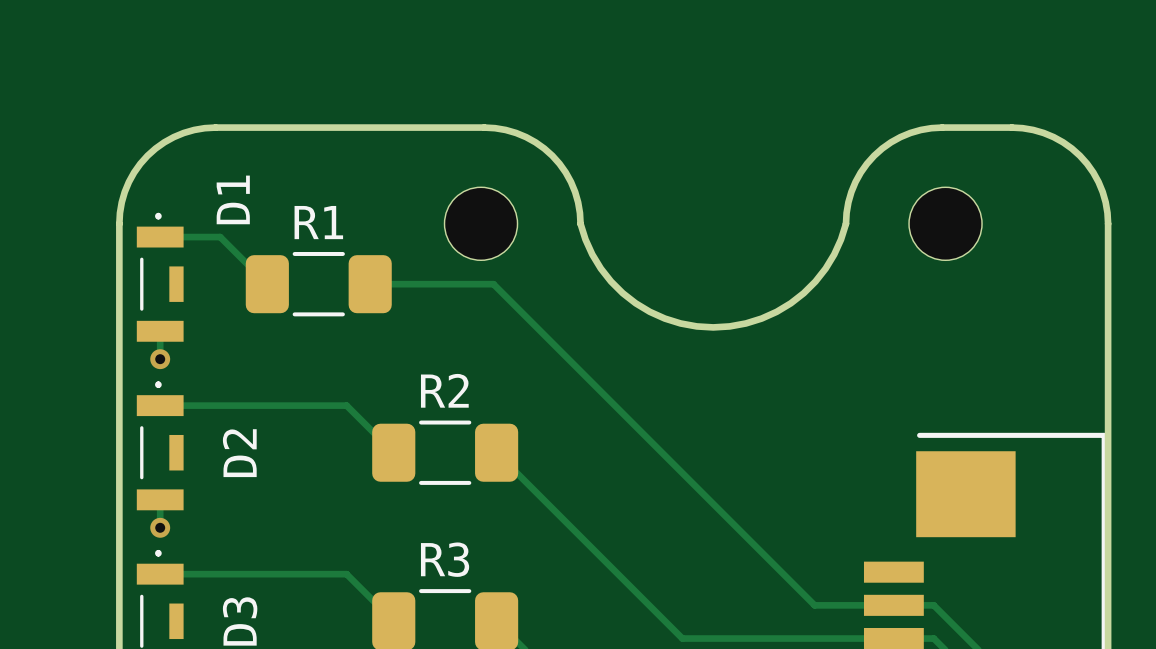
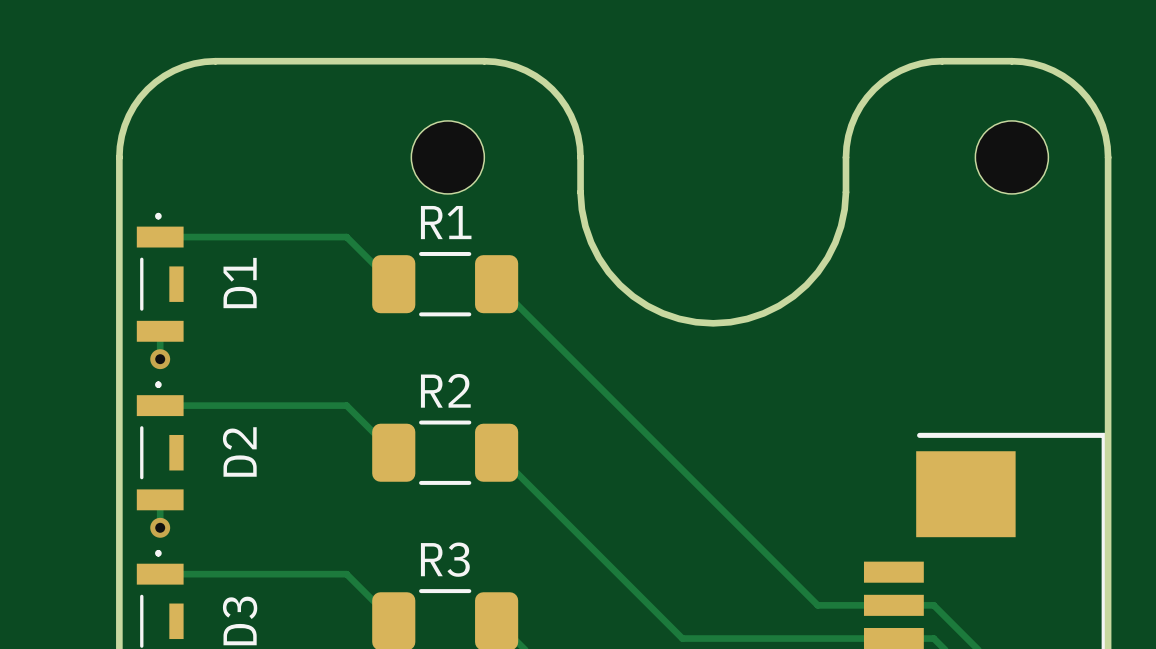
D1 name position: D1 (233, 199) -> D1 (240, 283)
board edge: (119, 223) (124, 192) (140, 163) (164, 142) (194, 129) (215, 127) (484, 127) (505, 129) (535, 142) (559, 163) (575, 192) (580, 223) (592, 254) (600, 268) (622, 293) (635, 303) (664, 318) (696, 326) (713, 327) (729, 326) (761, 318) (776, 311) (803, 293) (815, 281) (834, 254) (845, 223) (851, 192) (866, 163) (891, 142) (920, 129) (942, 127) (1011, 127) (1033, 129) (1053, 137) (1071, 148) (1093, 172) (1102, 192) (1108, 223) -> (119, 223) (119, 146) (124, 125) (134, 106) (155, 82) (173, 70) (194, 63) (215, 61) (484, 61) (505, 63) (526, 70) (544, 82) (559, 97) (575, 125) (579, 146) (581, 209) (591, 242) (598, 257) (620, 285) (647, 305) (662, 313) (696, 322) (730, 322) (763, 313) (793, 296) (817, 272) (827, 257) (841, 226) (845, 192) (846, 146) (855, 115) (866, 97) (882, 82) (900, 70) (920, 63) (942, 61) (1022, 61) (1053, 70) (1071, 82) (1093, 106) (1105, 136) (1108, 157) (1108, 223)
part position: (481, 223) -> (447, 157)
part position: (945, 223) -> (1011, 157)
track: (220, 237) (267, 284) -> (220, 237) (346, 237) (393, 284)
R1 position: (318, 284) -> (445, 284)
track: (370, 284) (493, 284) (814, 605) (817, 605) -> (496, 284) (817, 605)

